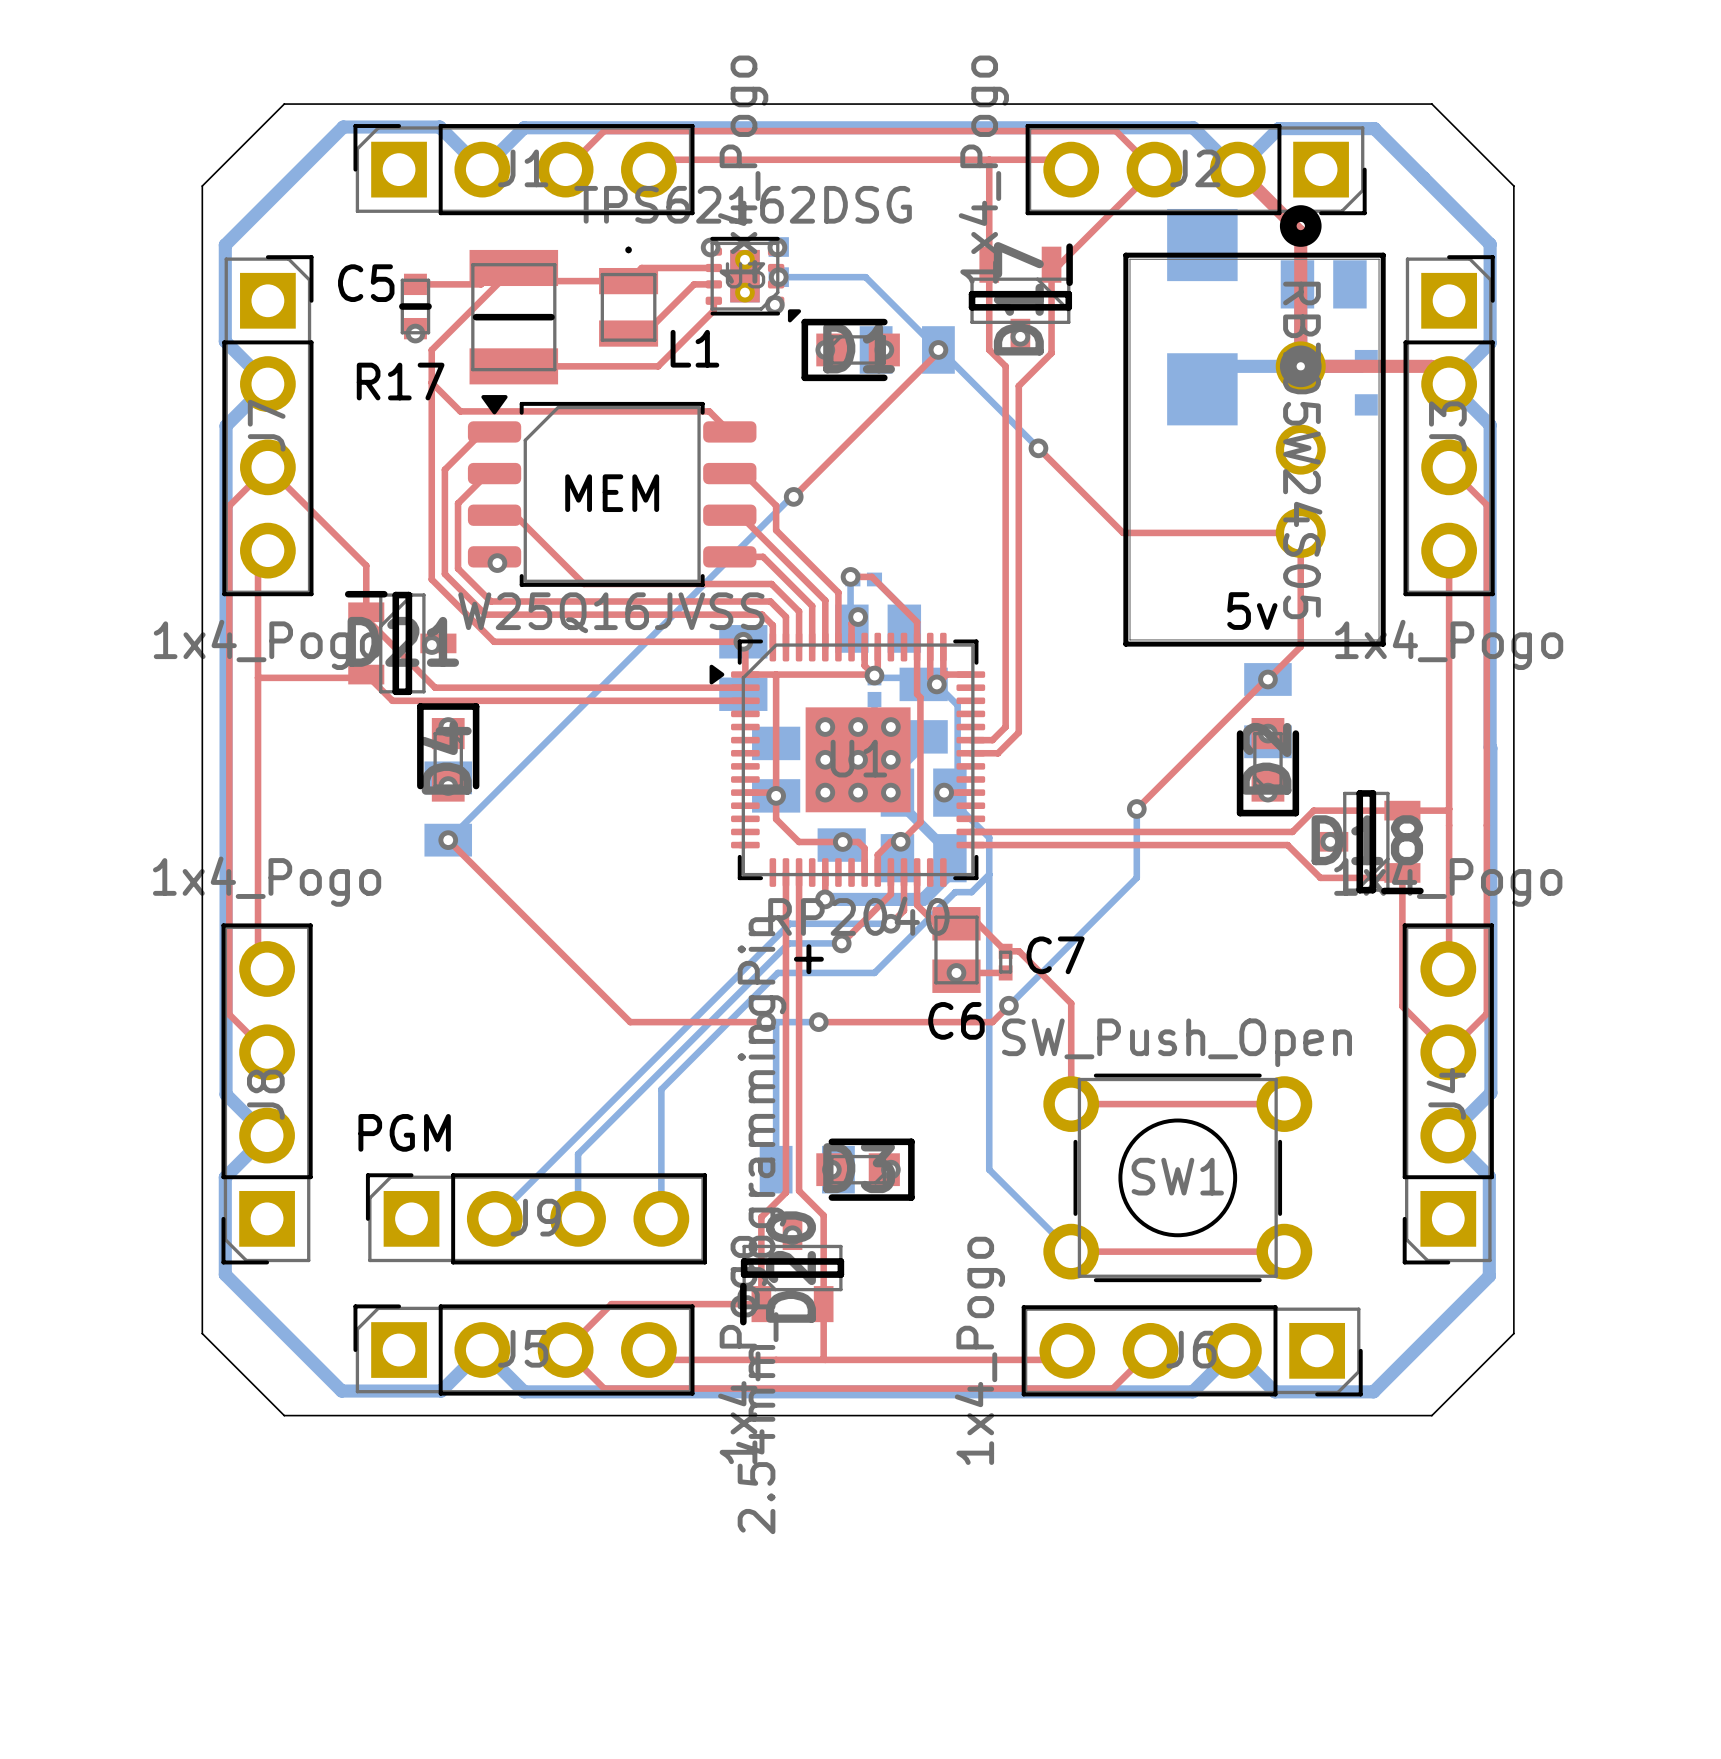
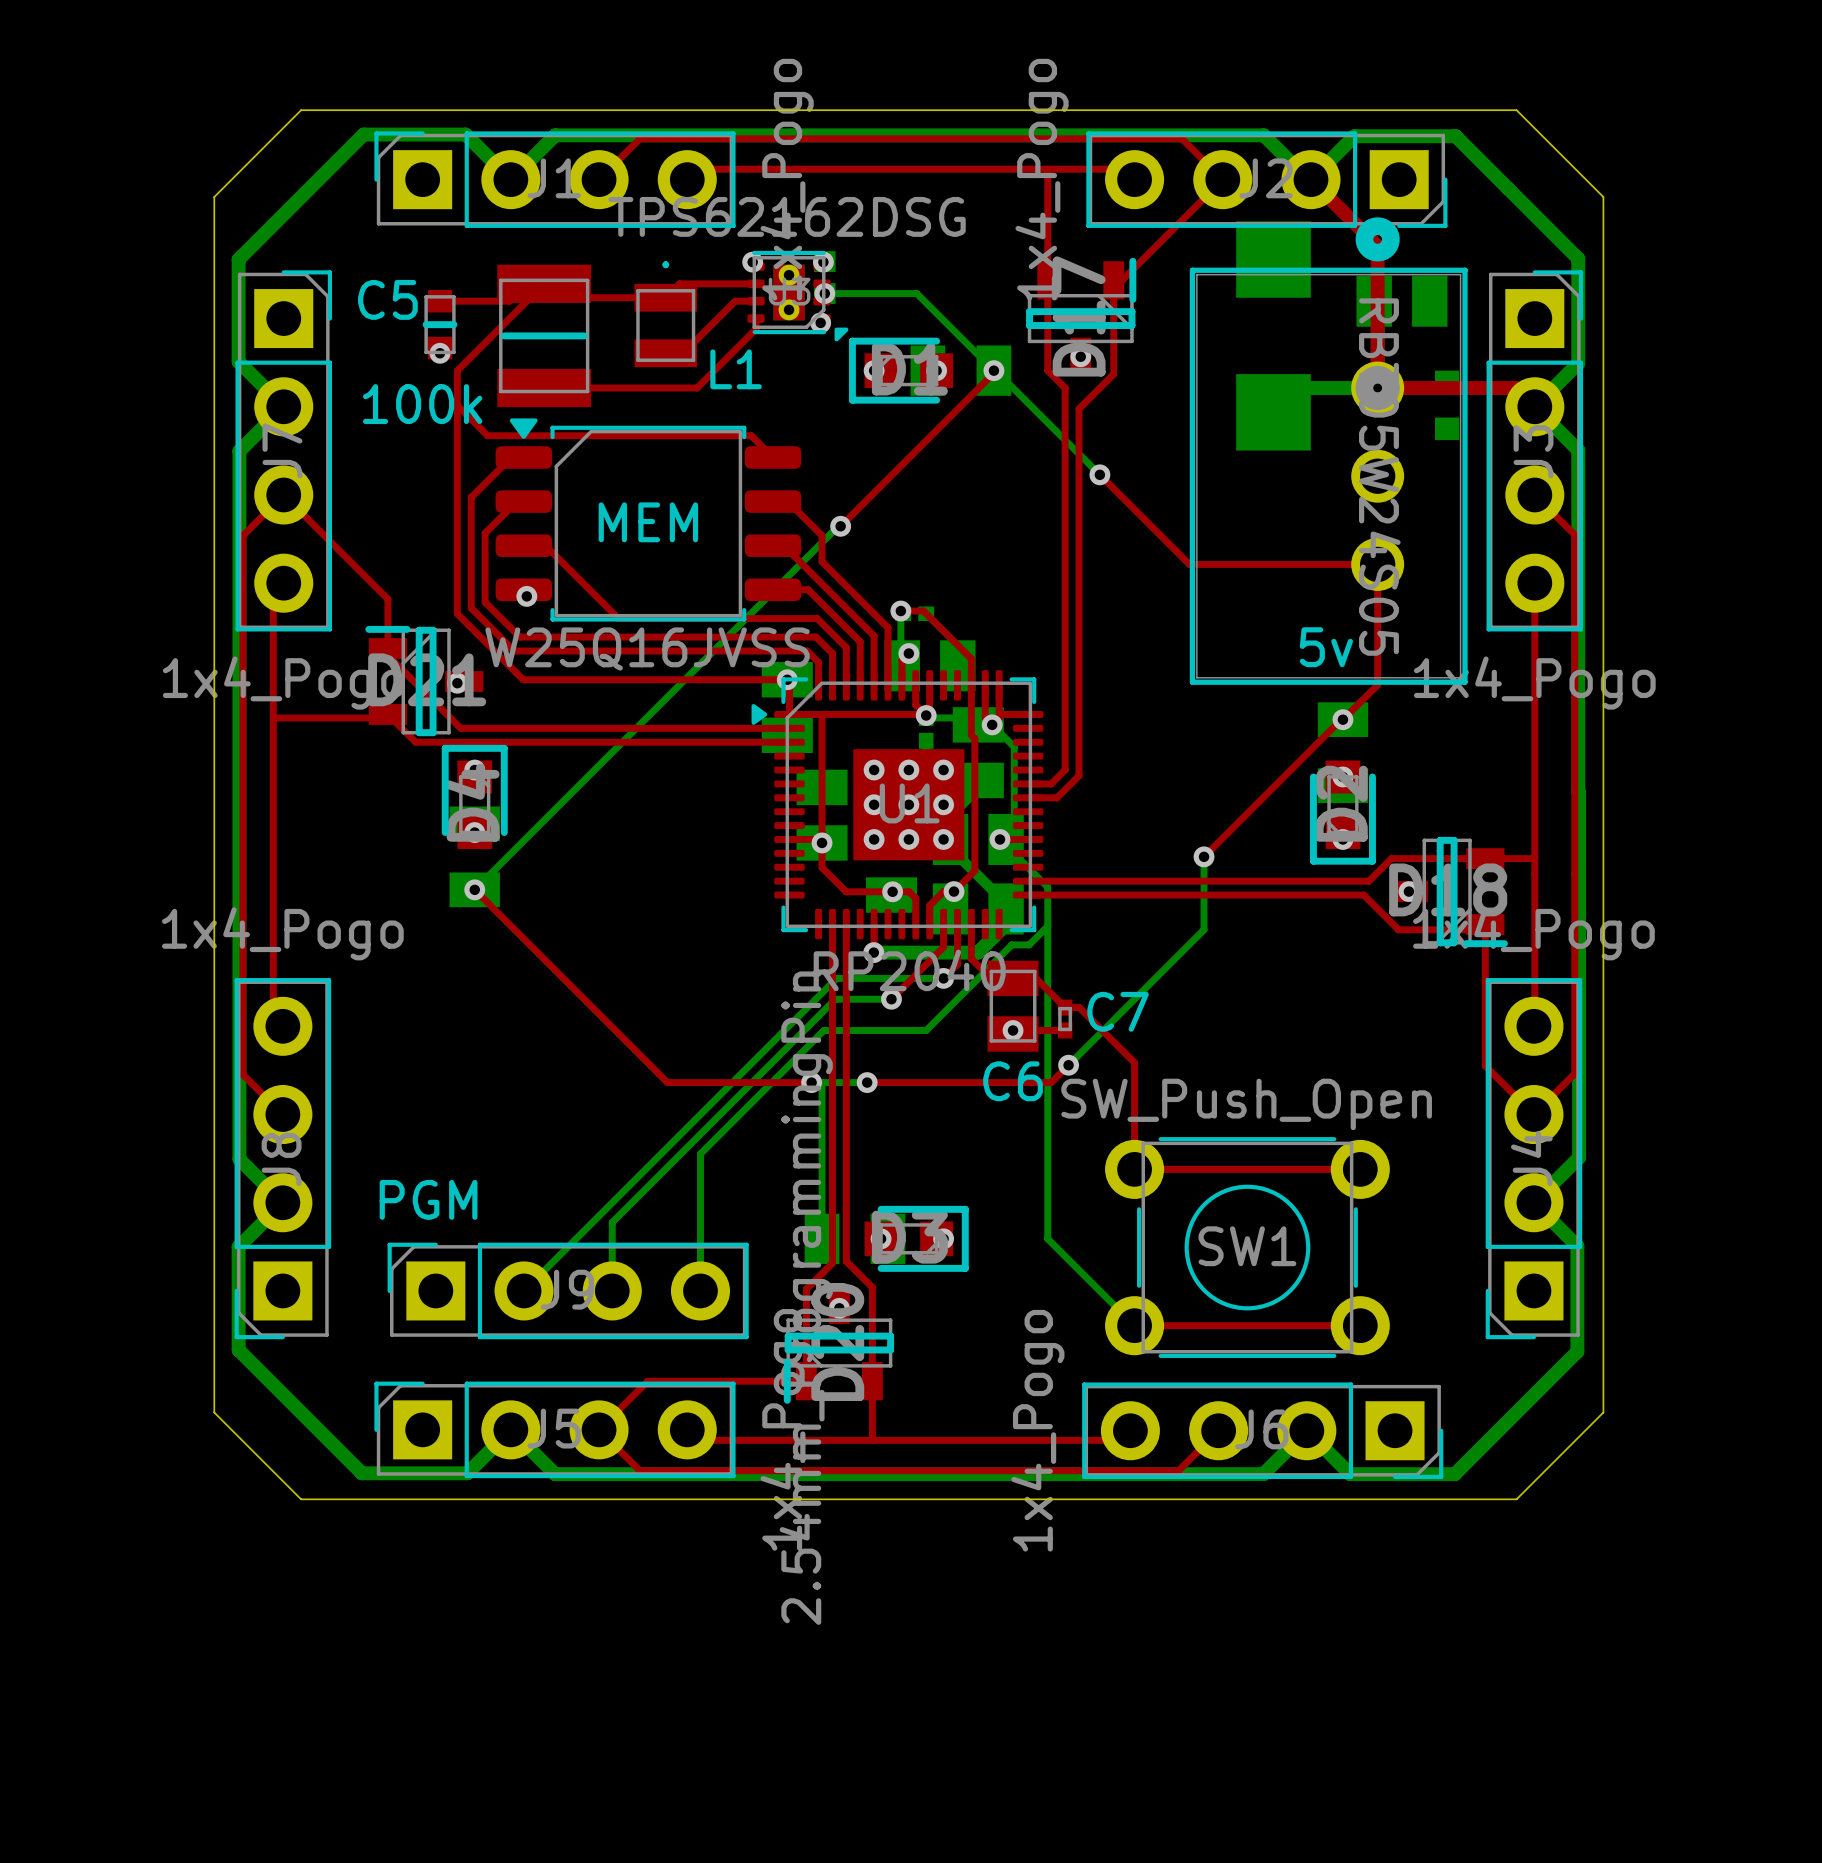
R17 name: R17 (400, 381) -> 100k (422, 404)
text: + (808, 959) -> none

